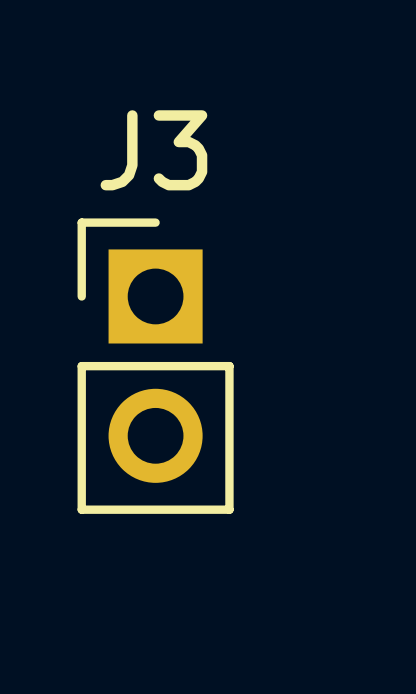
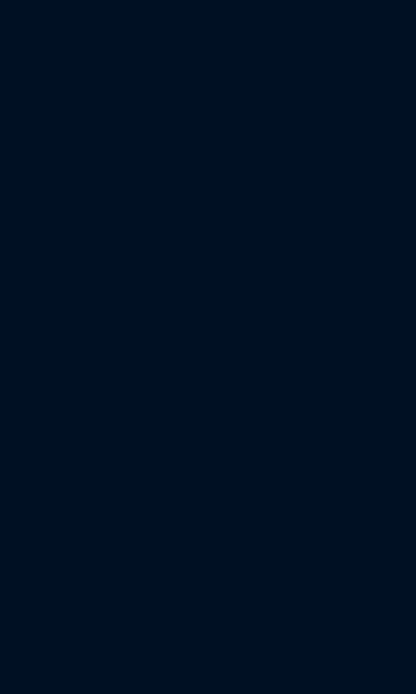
J3: (155, 366) -> none

